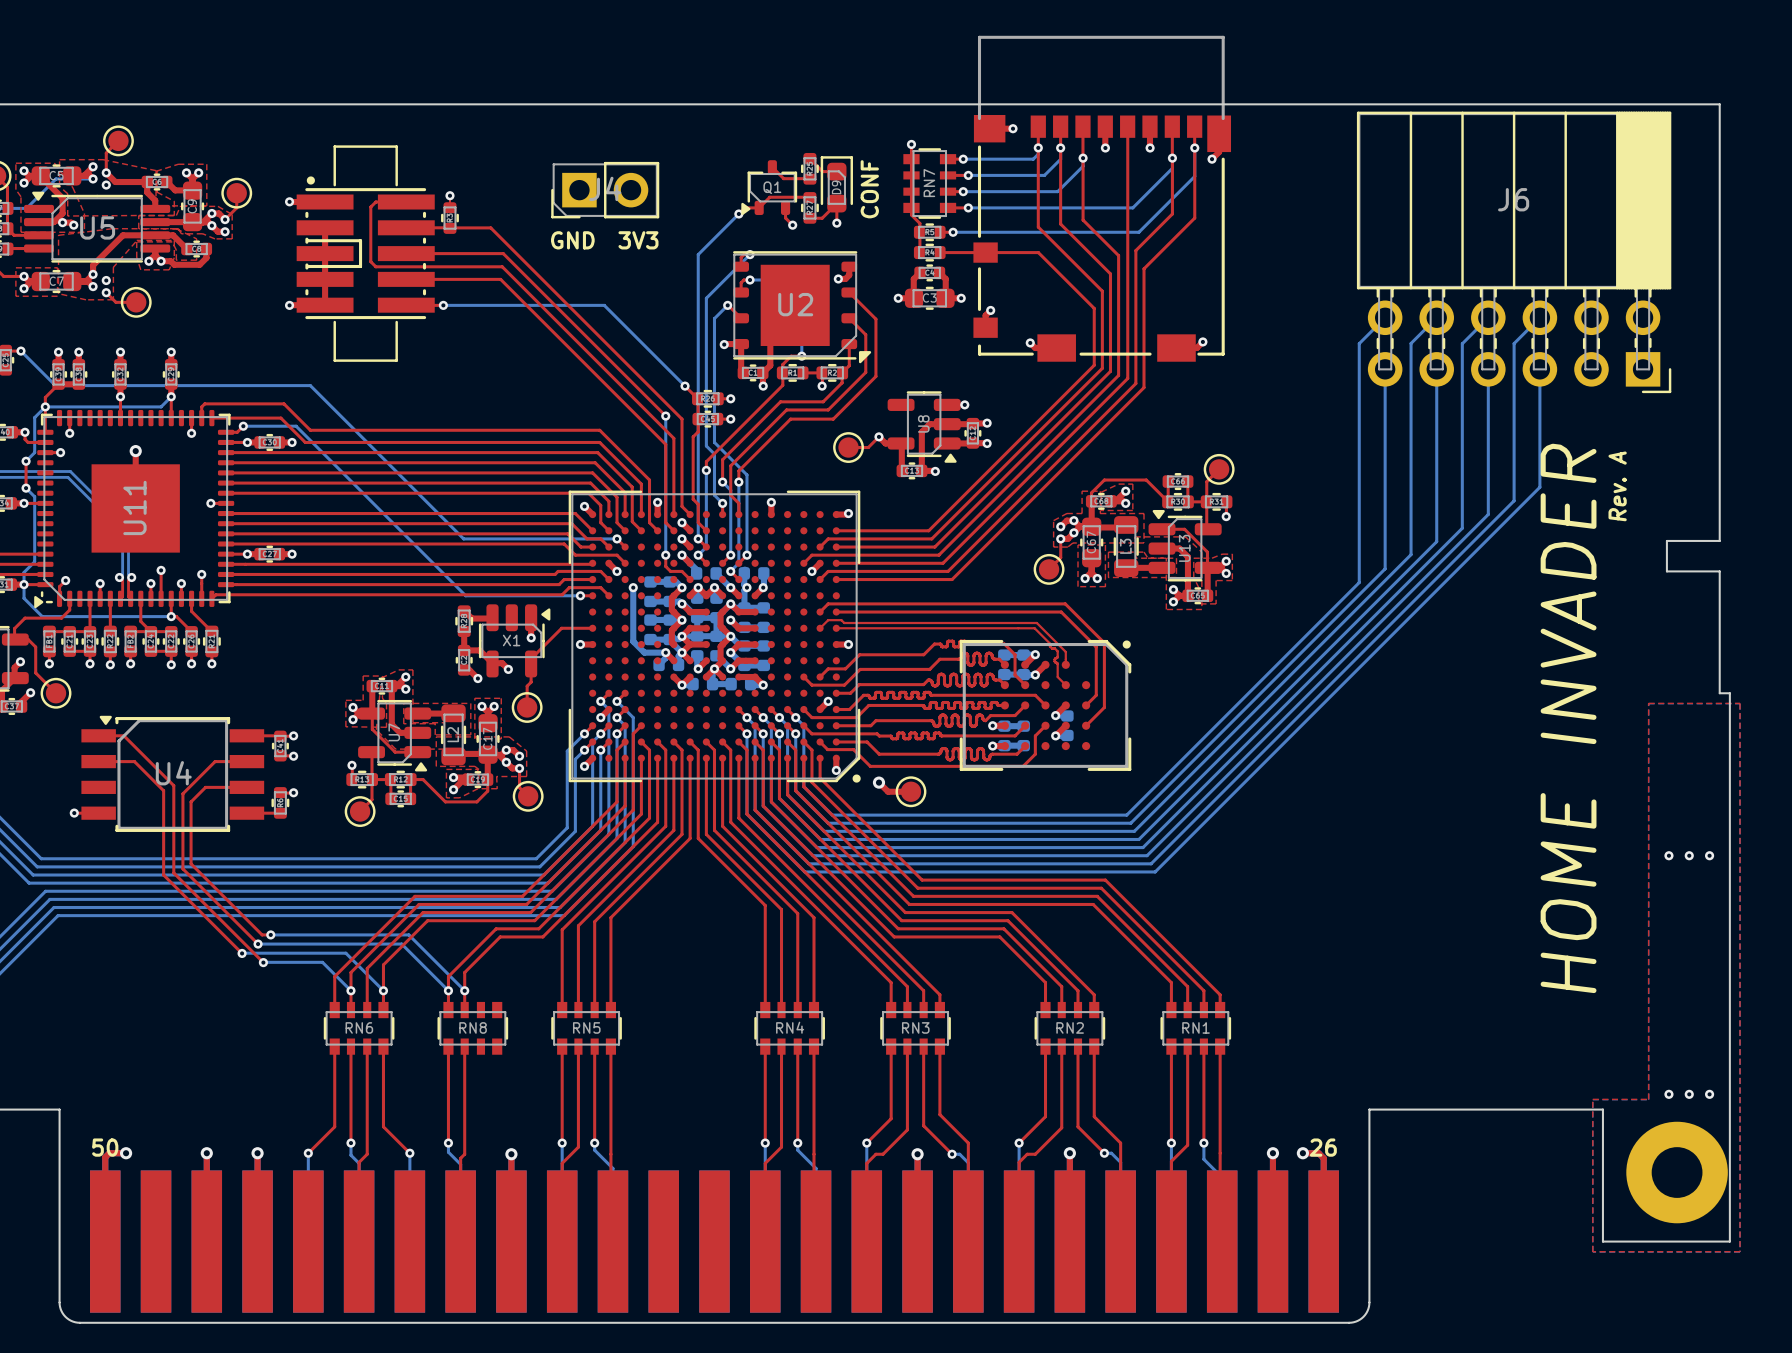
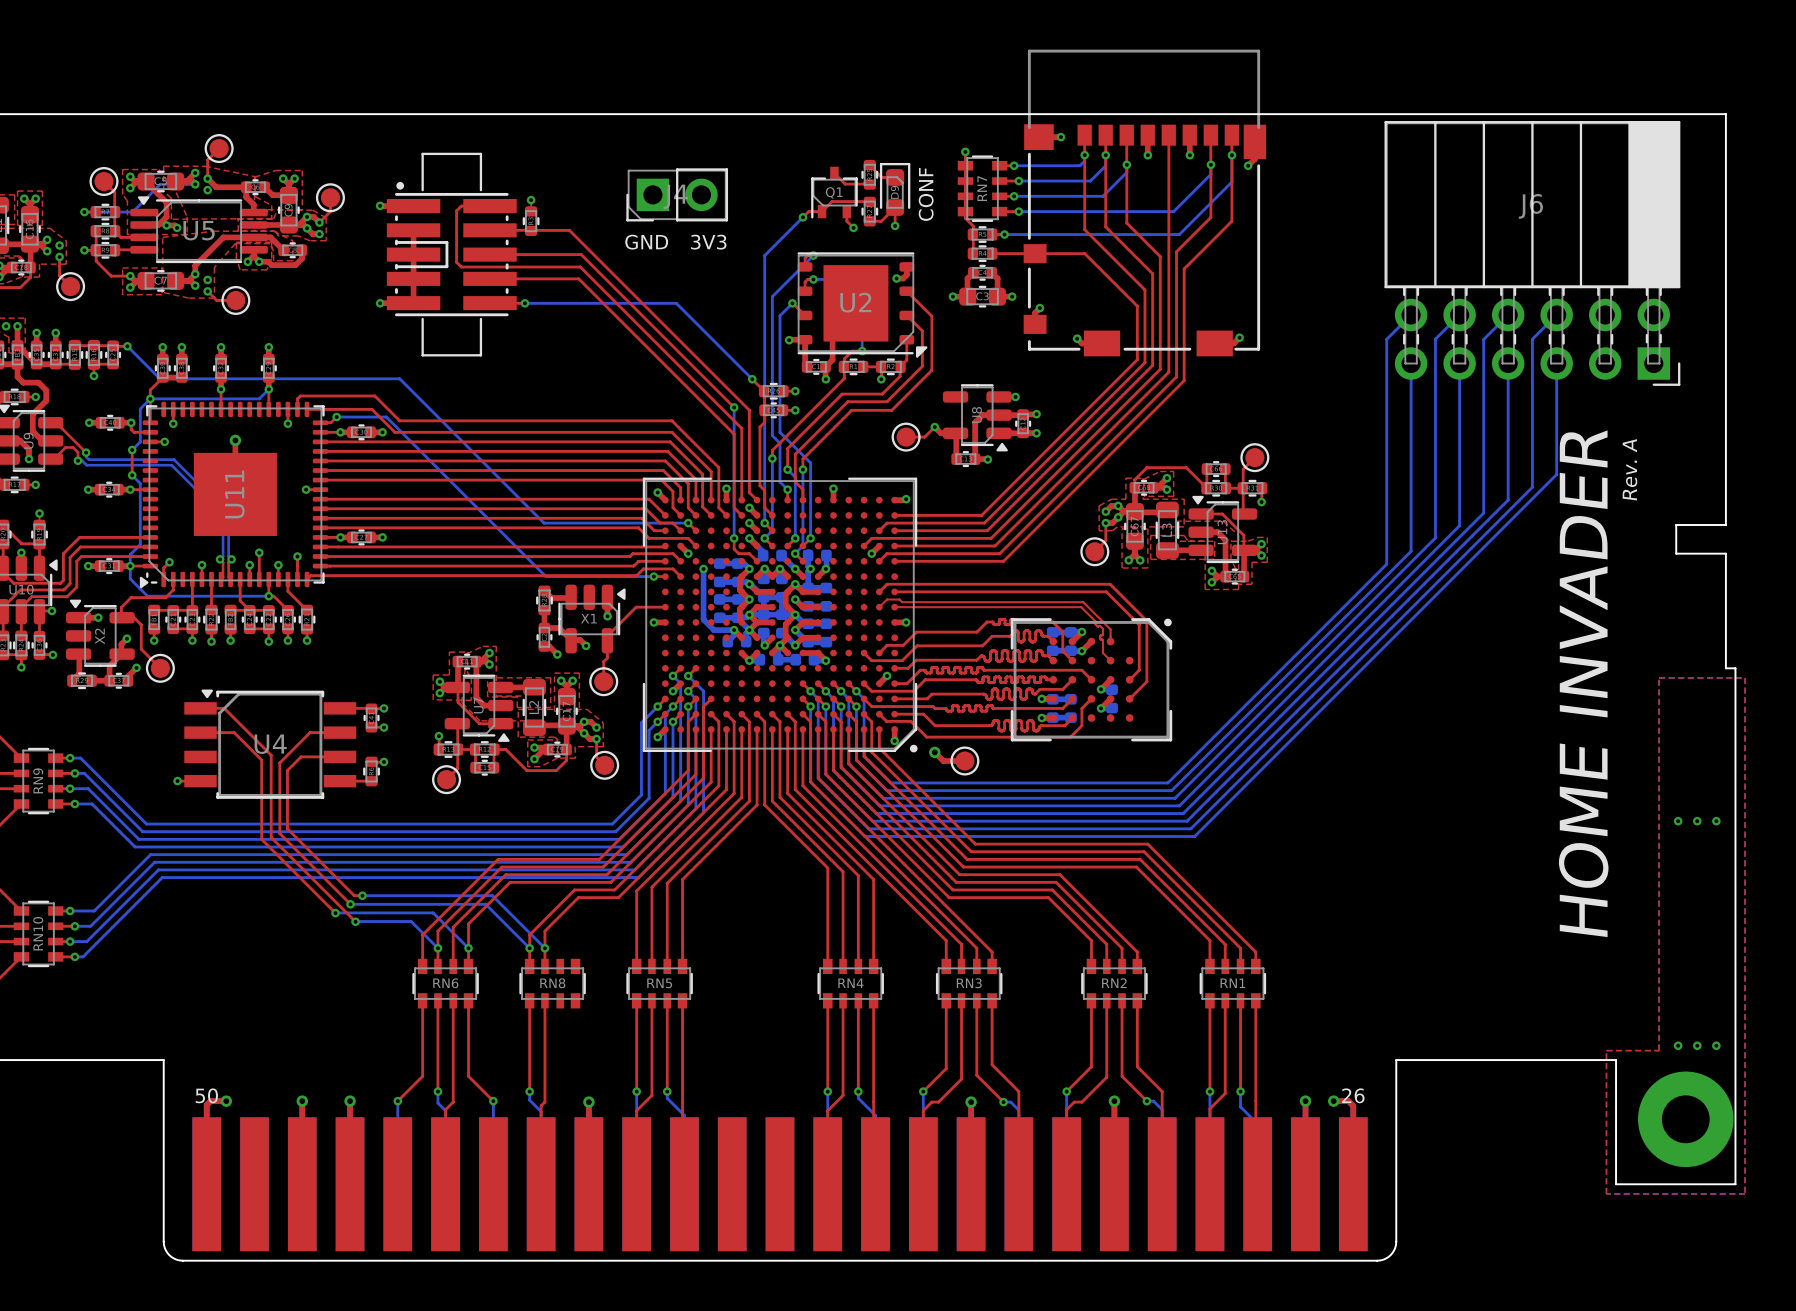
Q1 footprint: [741, 160, 798, 216] -> [811, 166, 858, 219]

